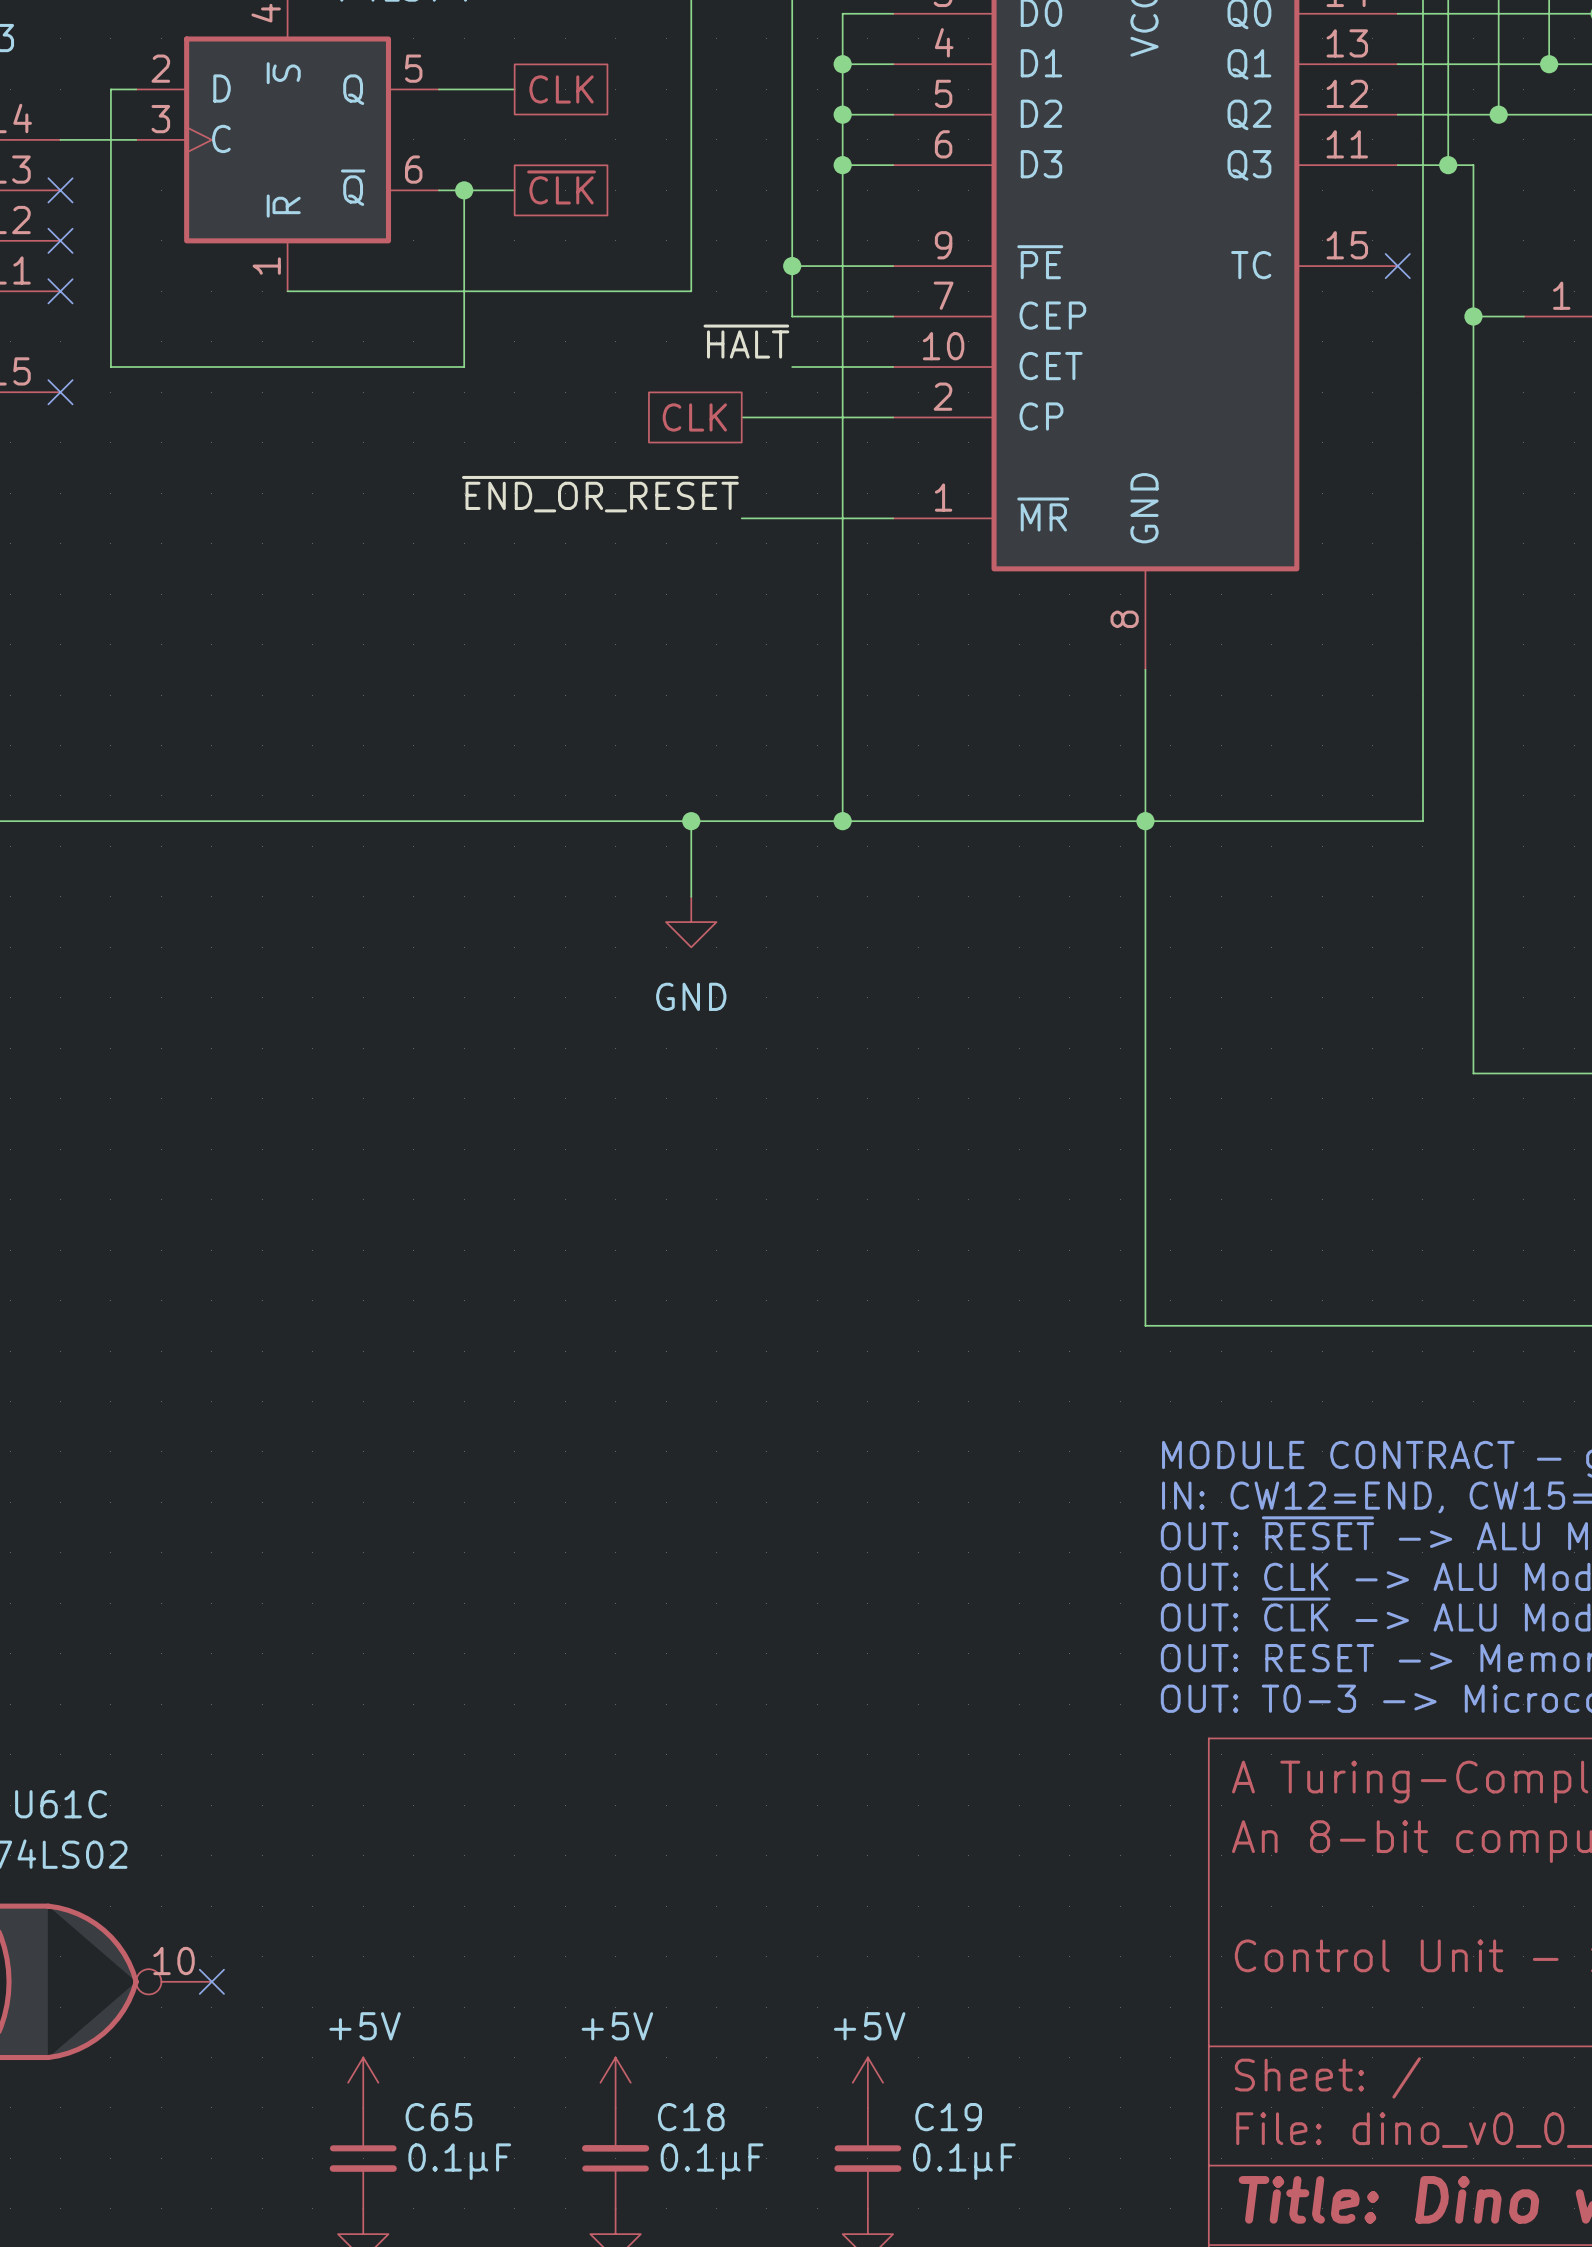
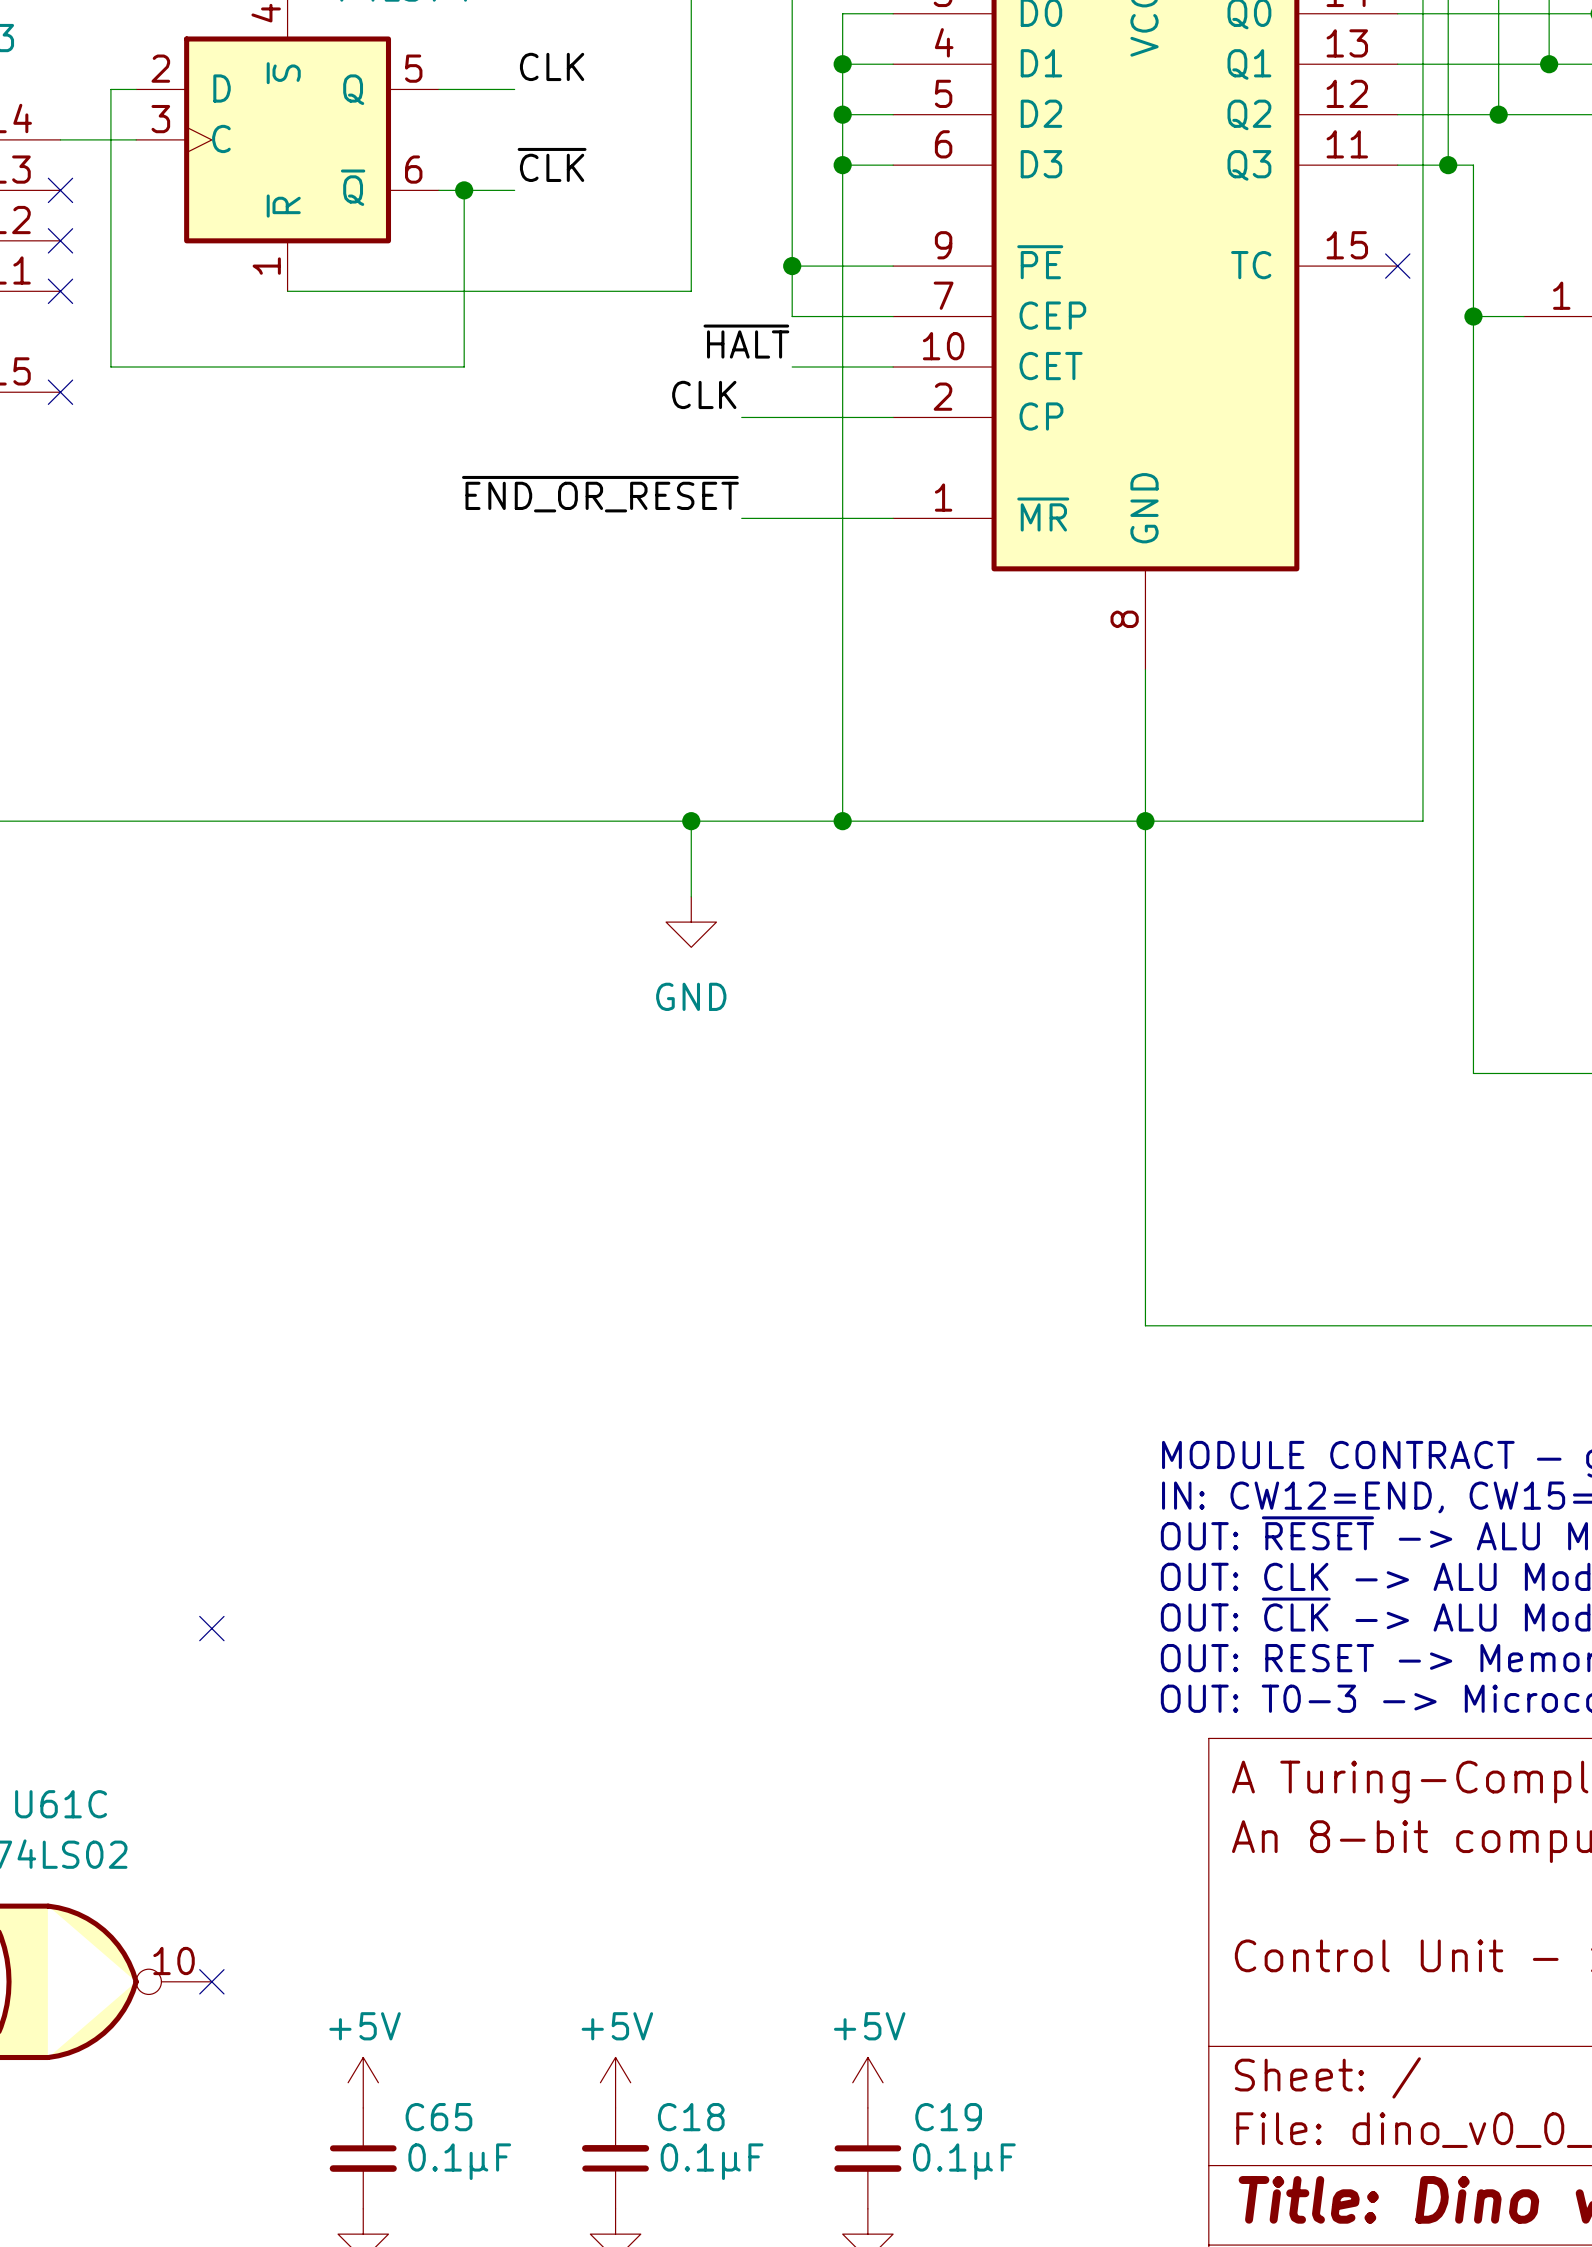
label: none -> CLK (552, 66)
global label: CLK (561, 89) -> none
label: none -> ~{CLK} (552, 164)
global label: ~{CLK} (561, 187) -> none
label: none -> CLK (704, 394)
global label: CLK (694, 417) -> none
no-connect mark: none -> (211, 1628)

